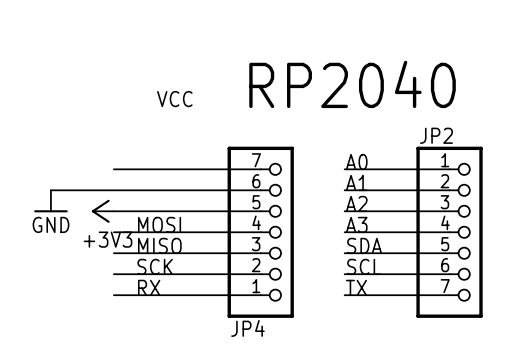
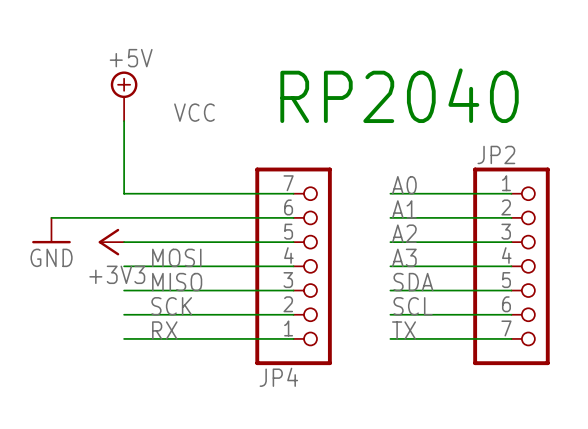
power symbol: none -> +5V (124, 96)
wire: none -> (124, 121) (124, 193)

